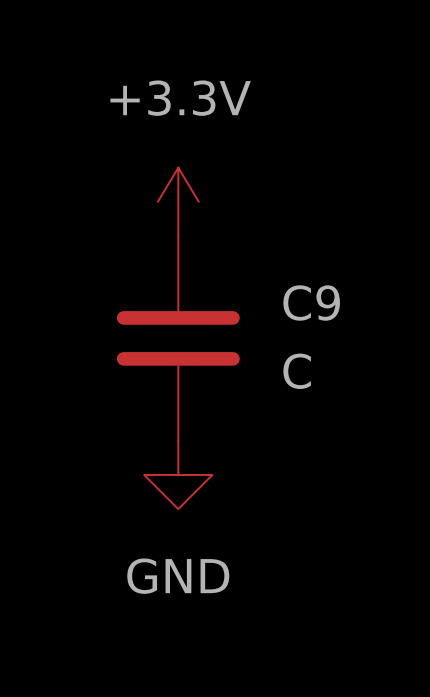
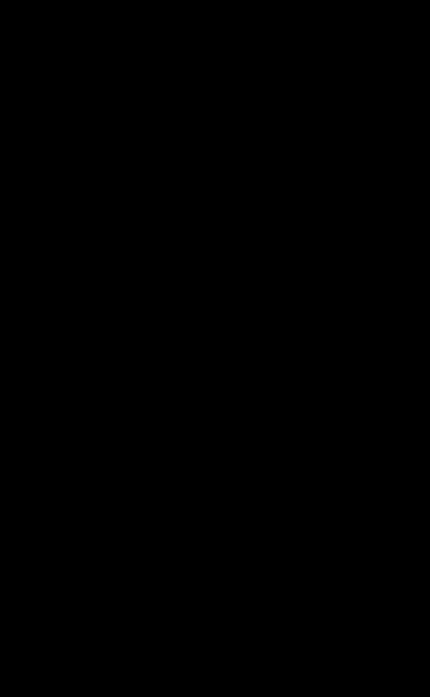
power symbol: +3.3V (178, 201) -> none
C9: C (178, 338) -> none
power symbol: GND (178, 474) -> none

